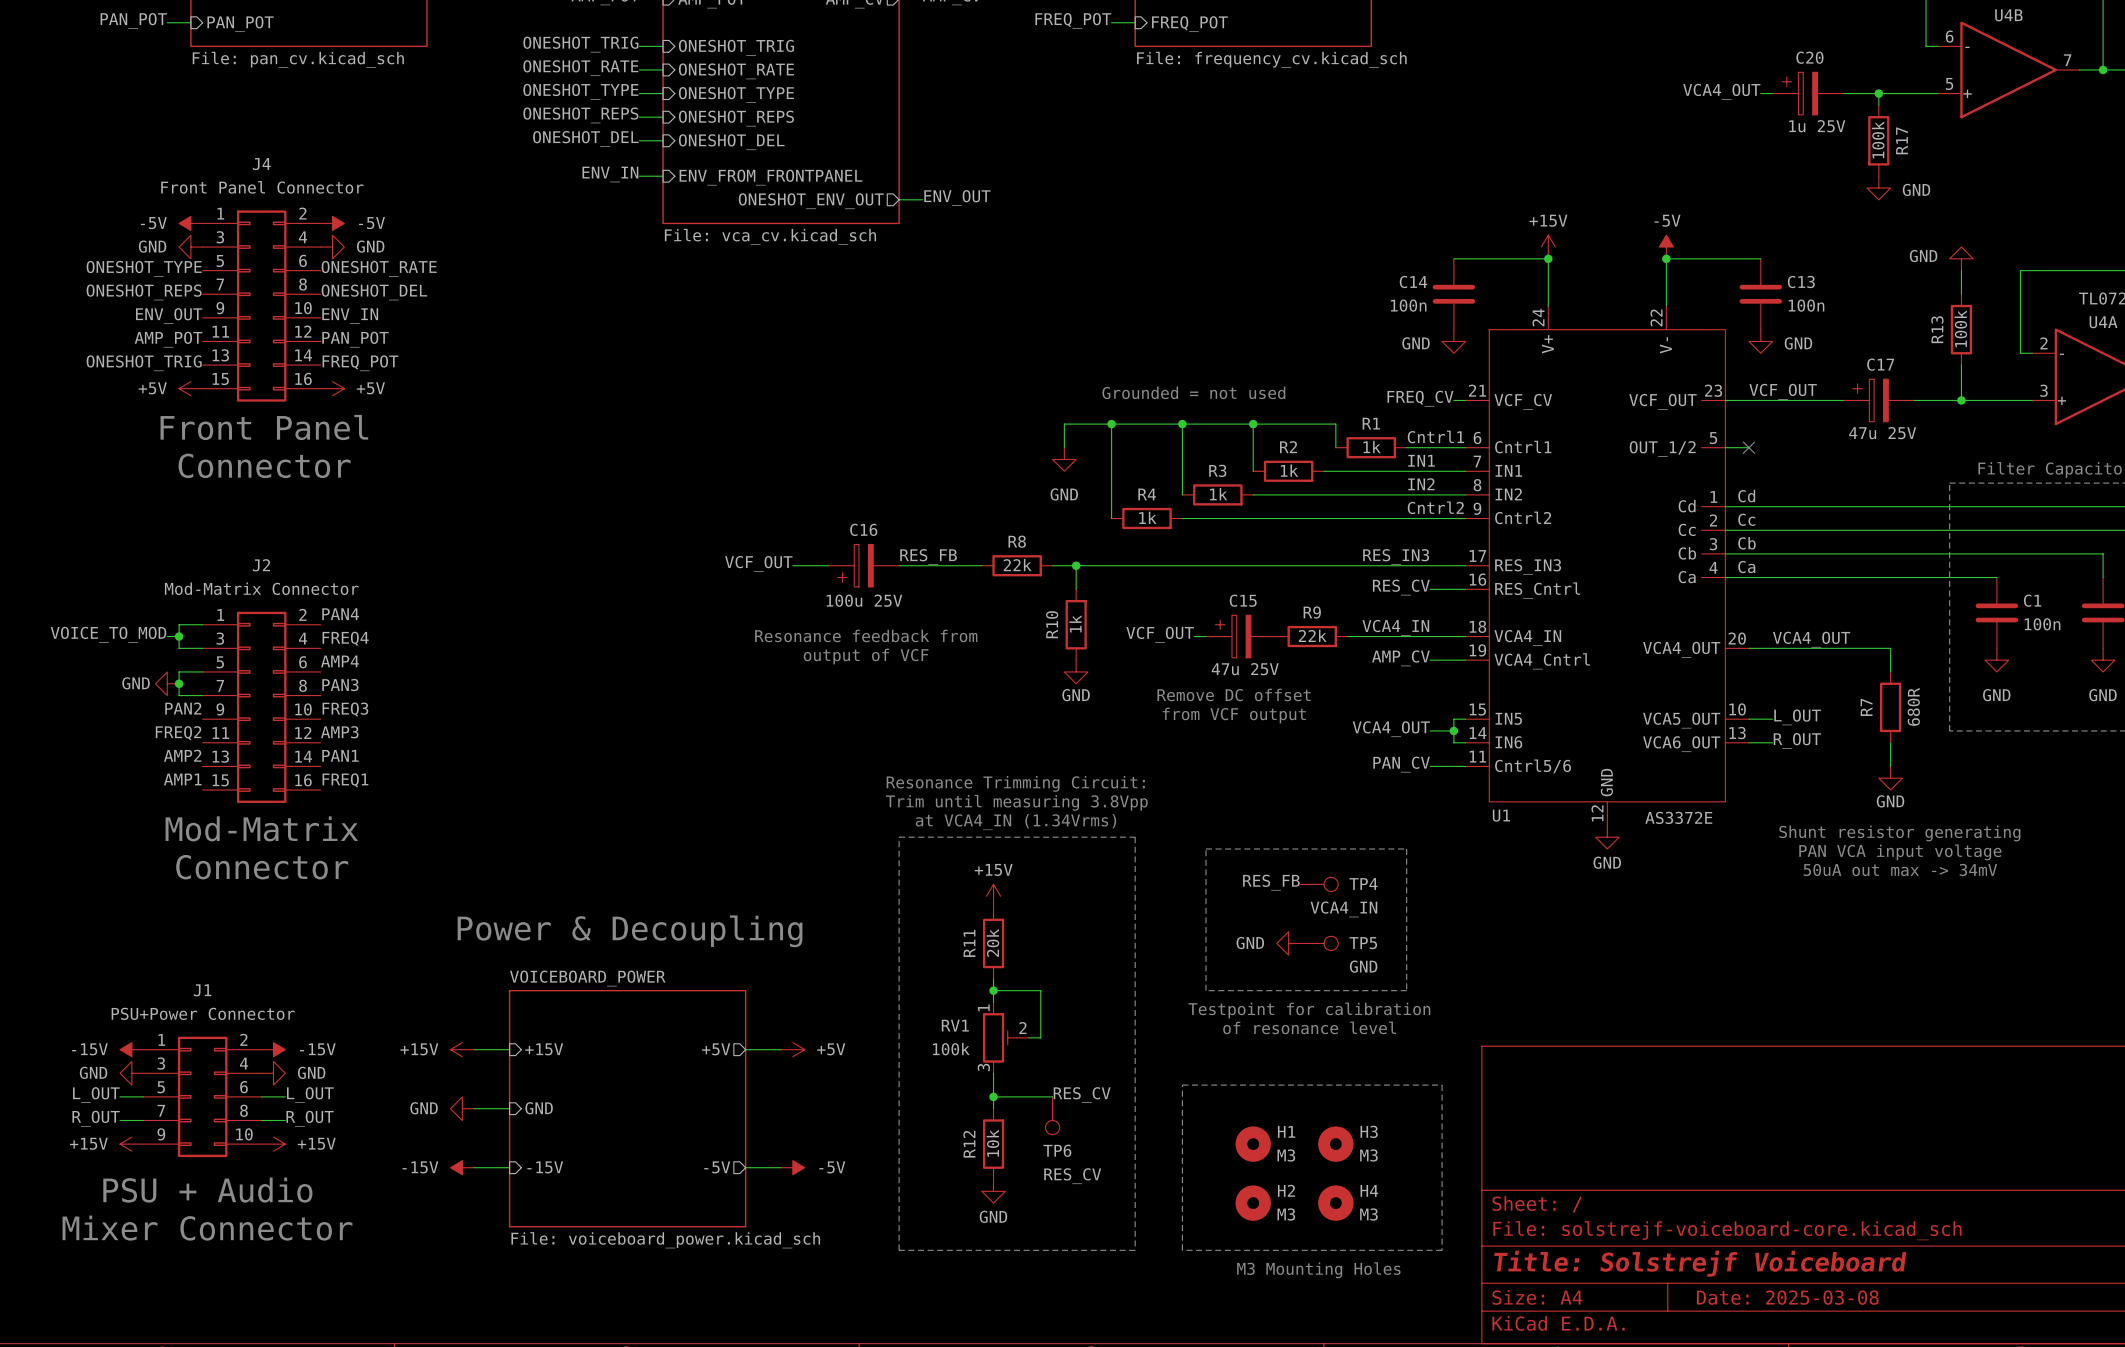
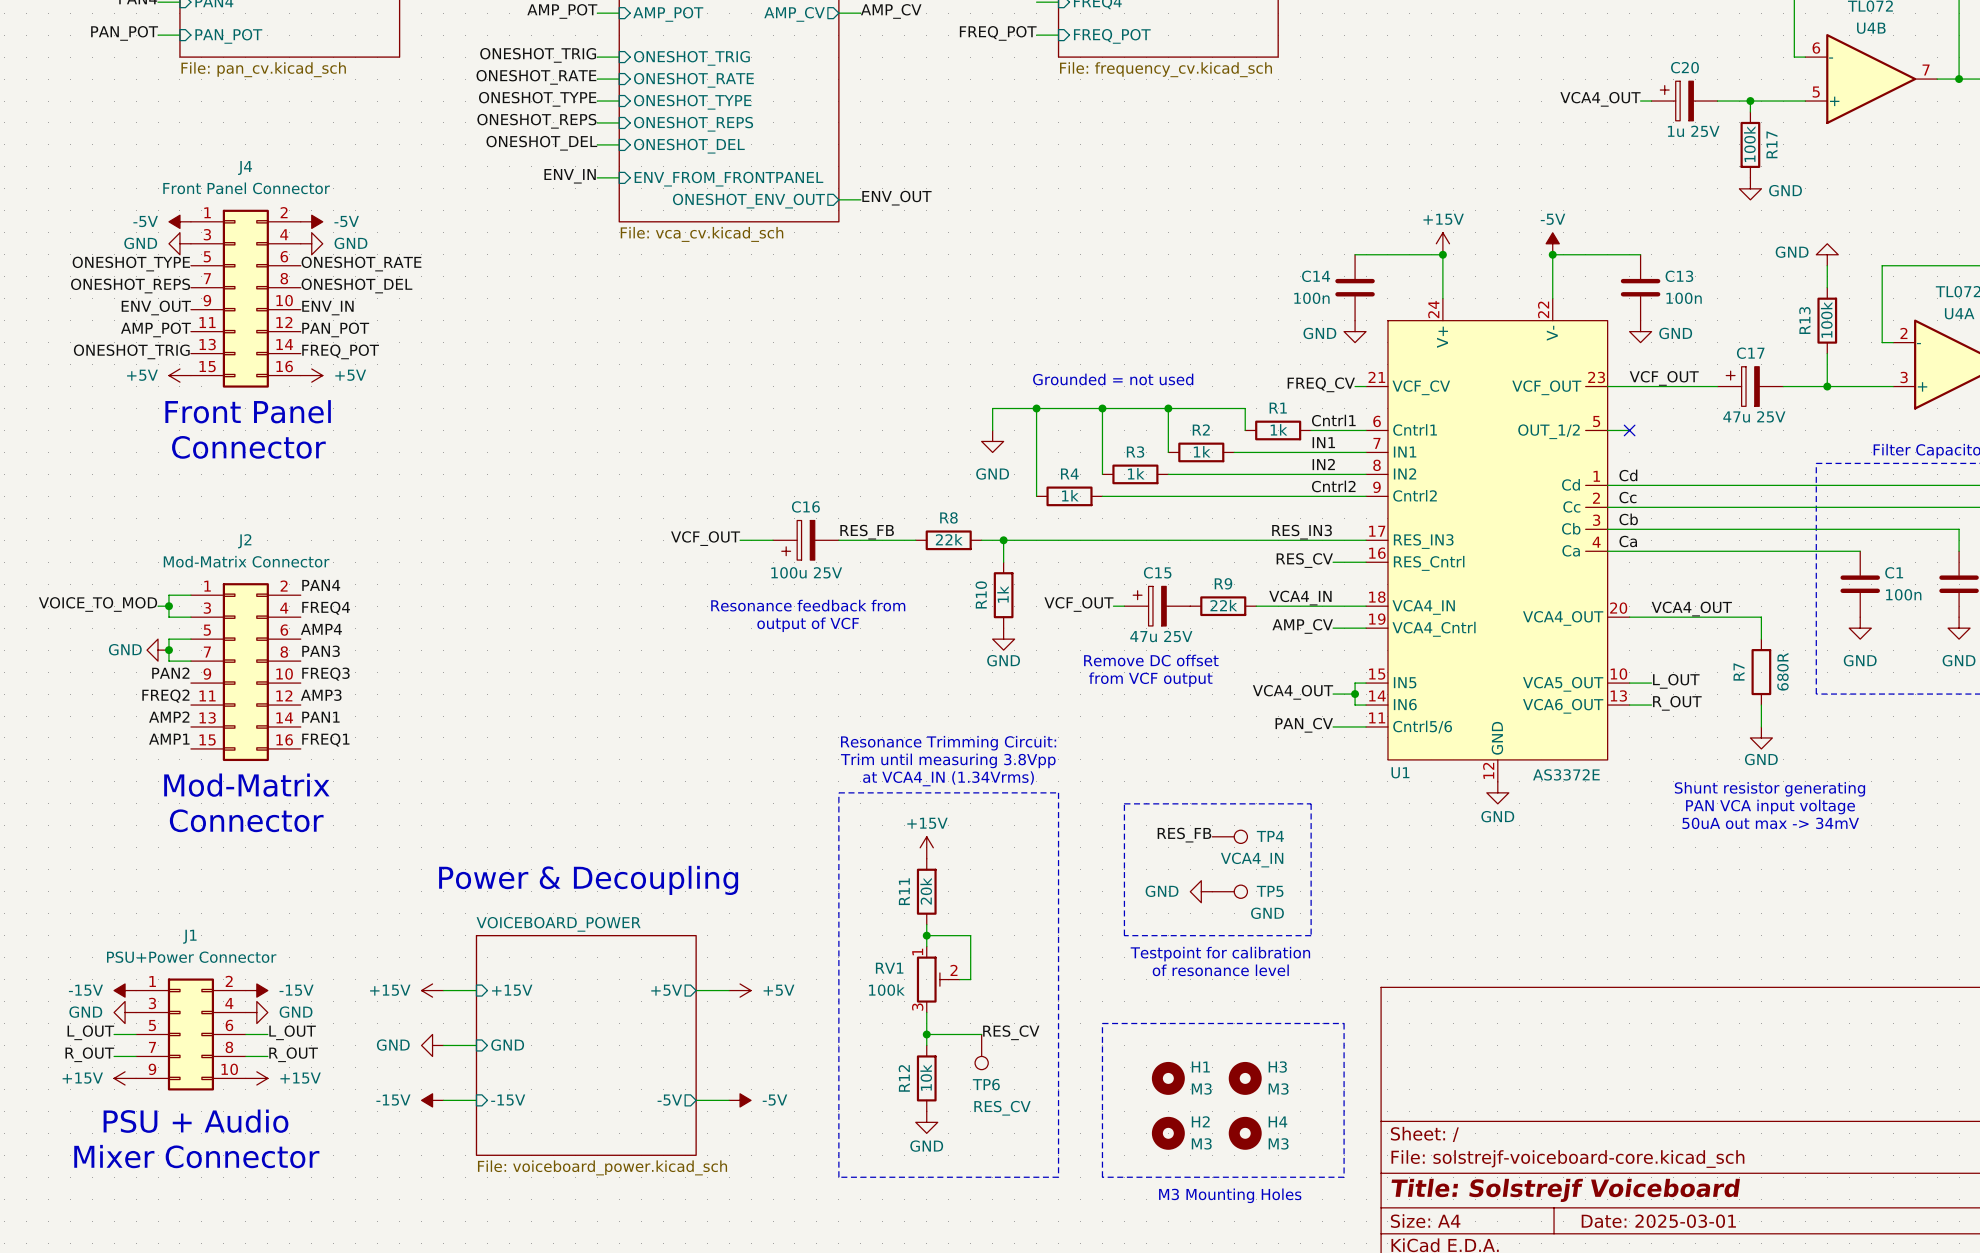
title block: Date: 2025-03-08 (1787, 1297) -> Date: 2025-03-01 (1658, 1221)

